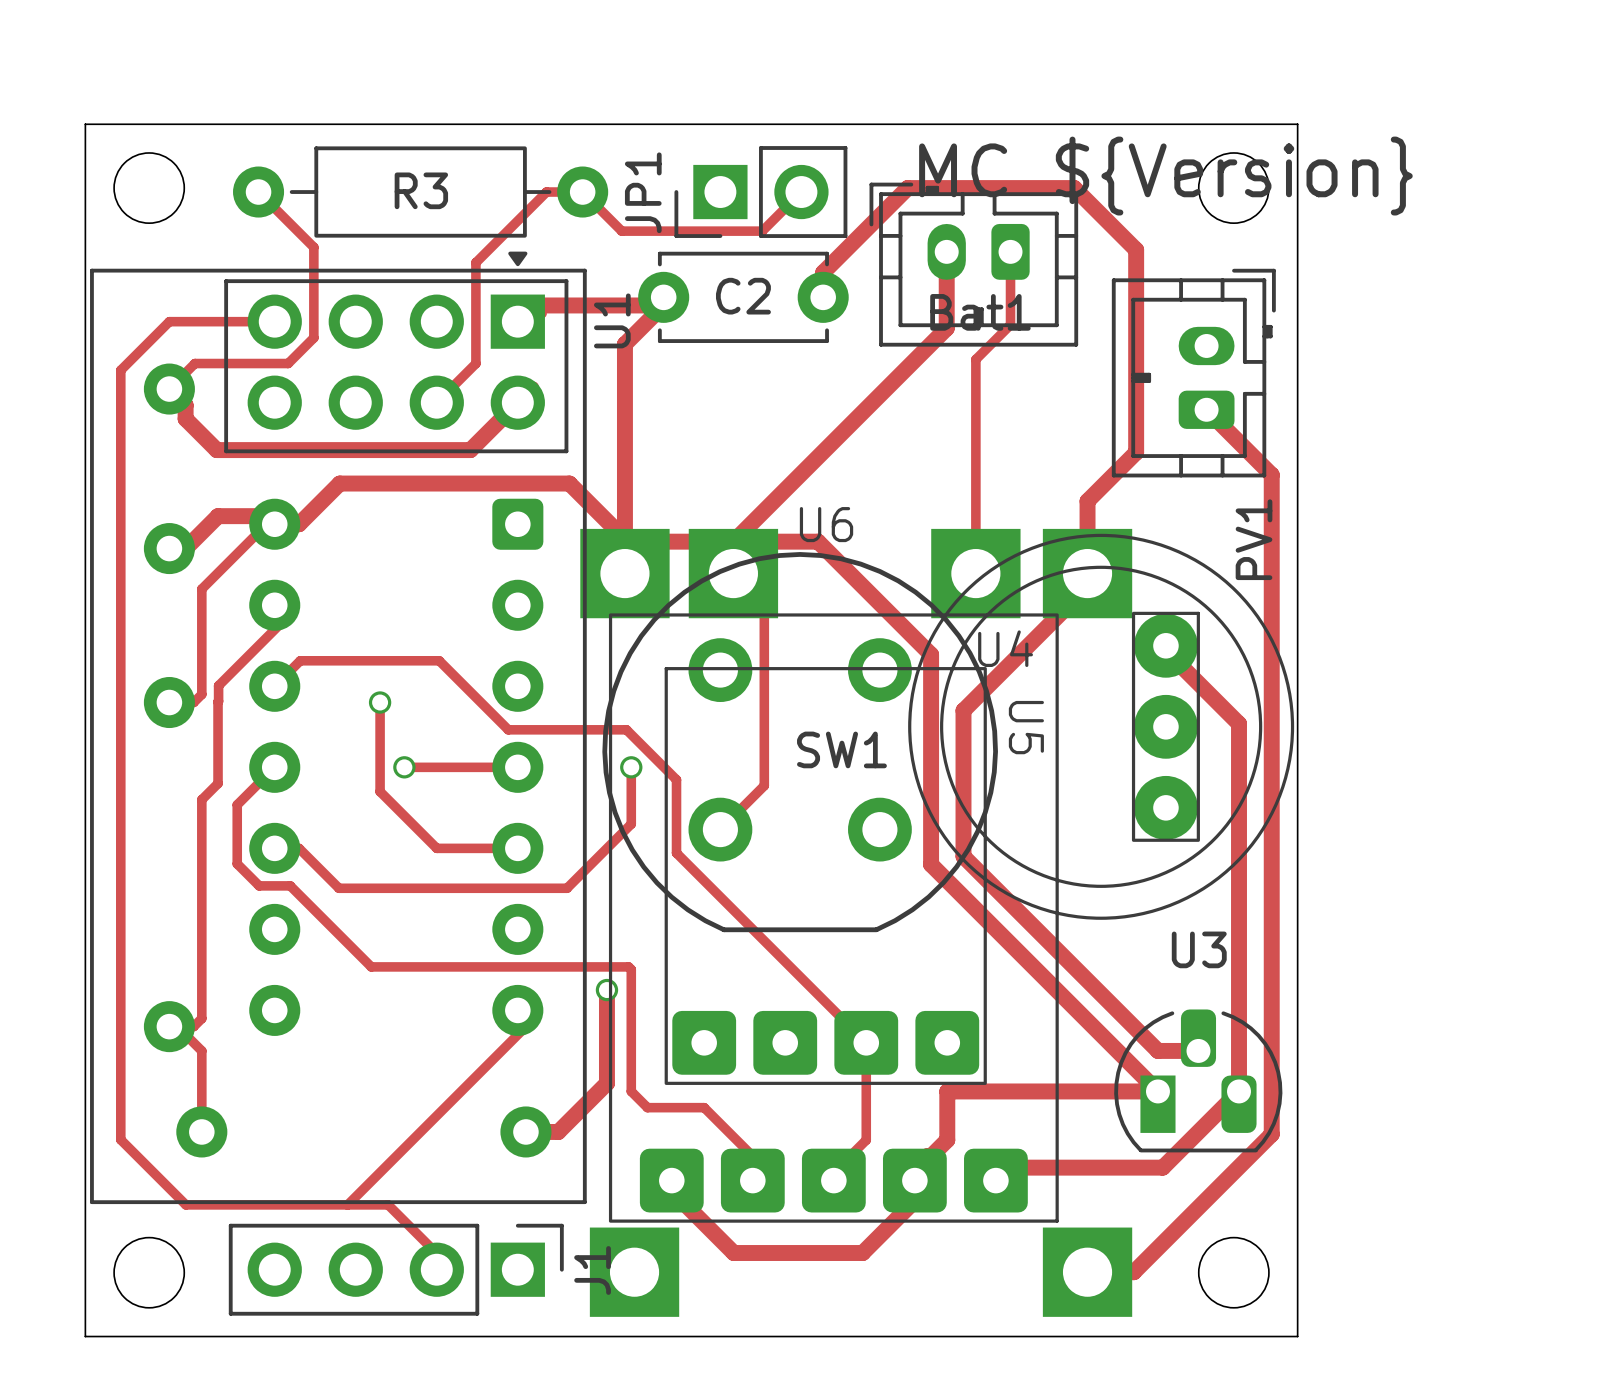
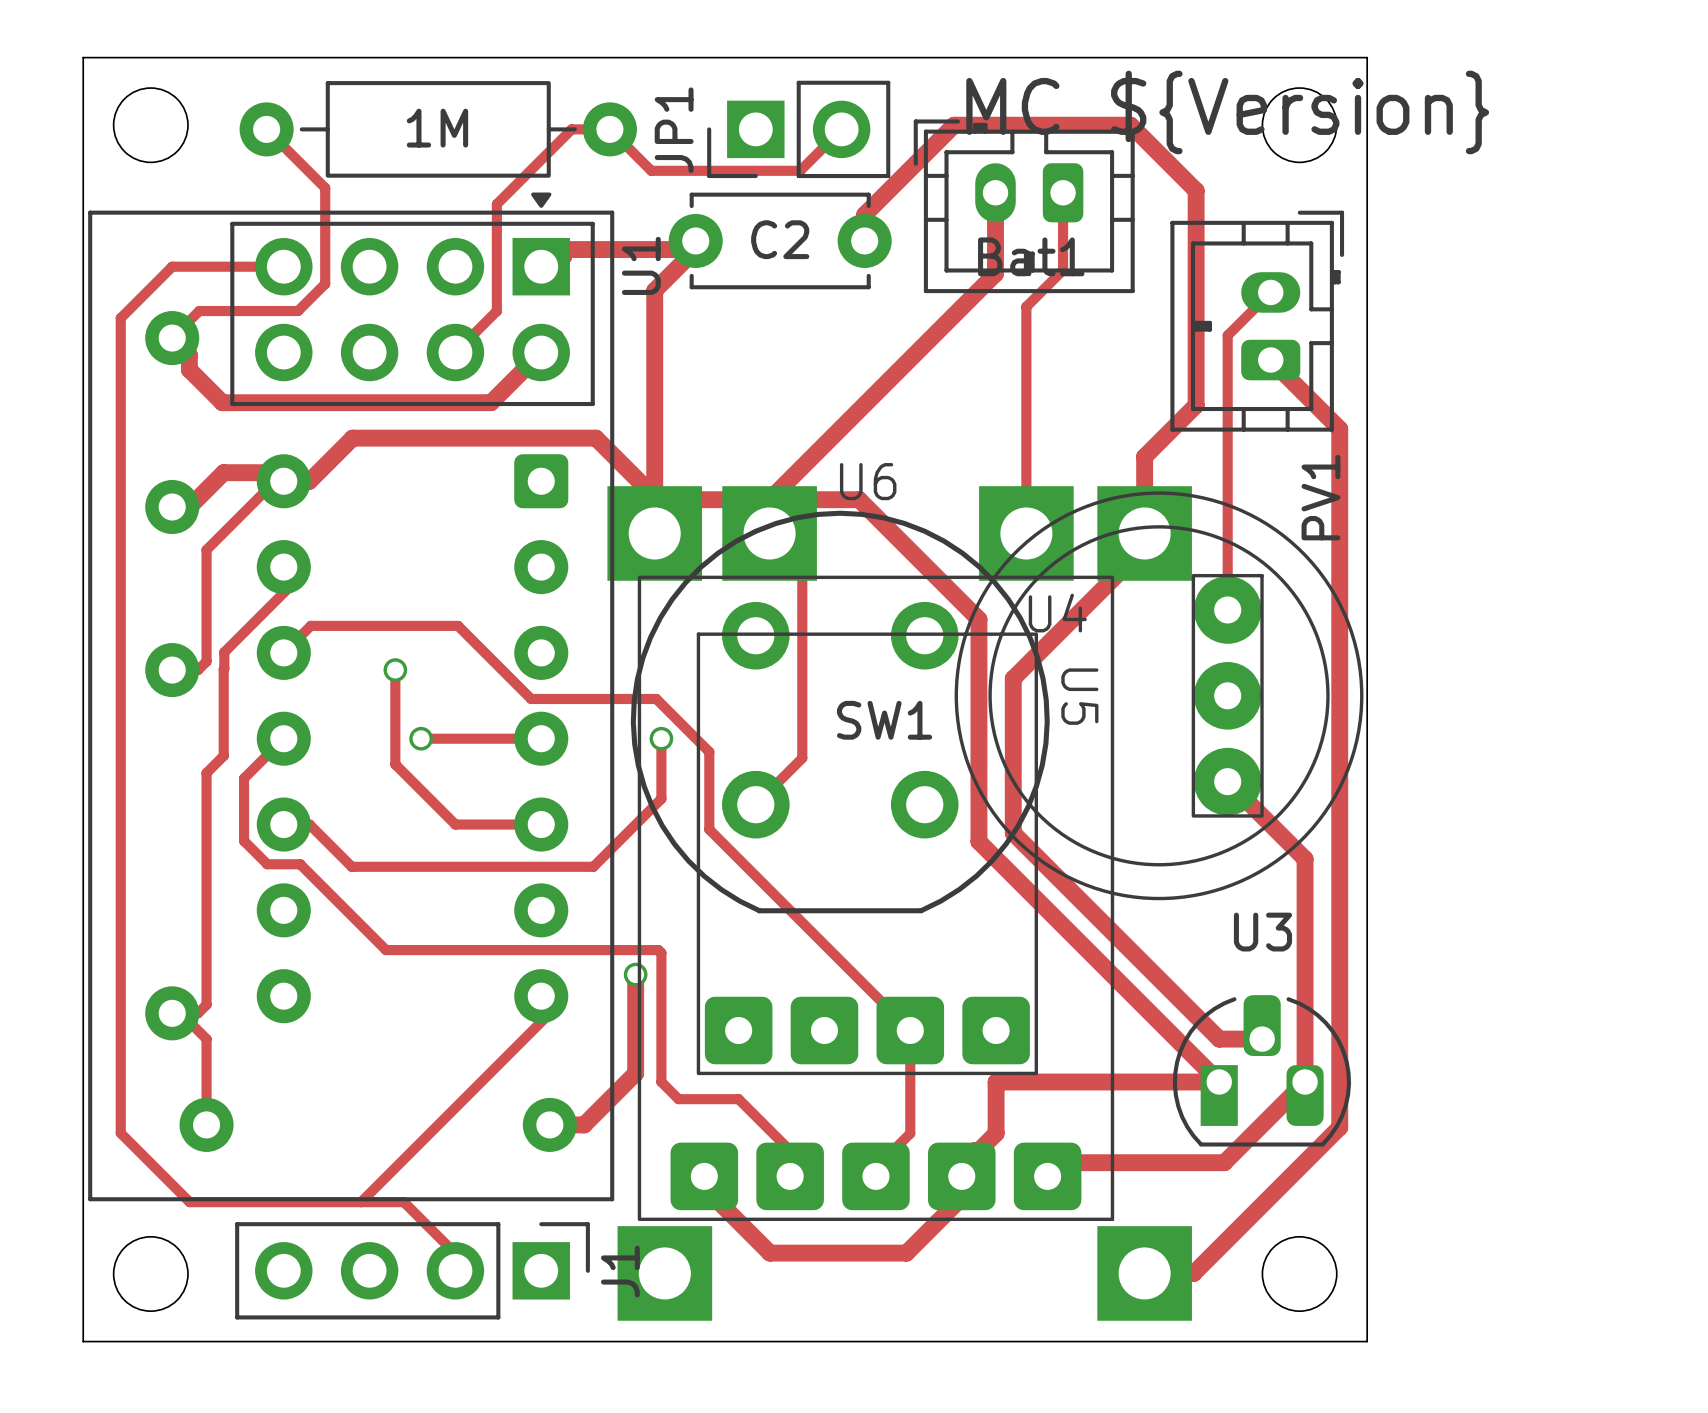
R3 name: R3 (421, 190) -> 1M (437, 128)
track: none -> (1270, 292) (1227, 335) (1227, 609)
track: (1169, 653) (1239, 723) (1239, 880) -> (1227, 781) (1305, 859)

